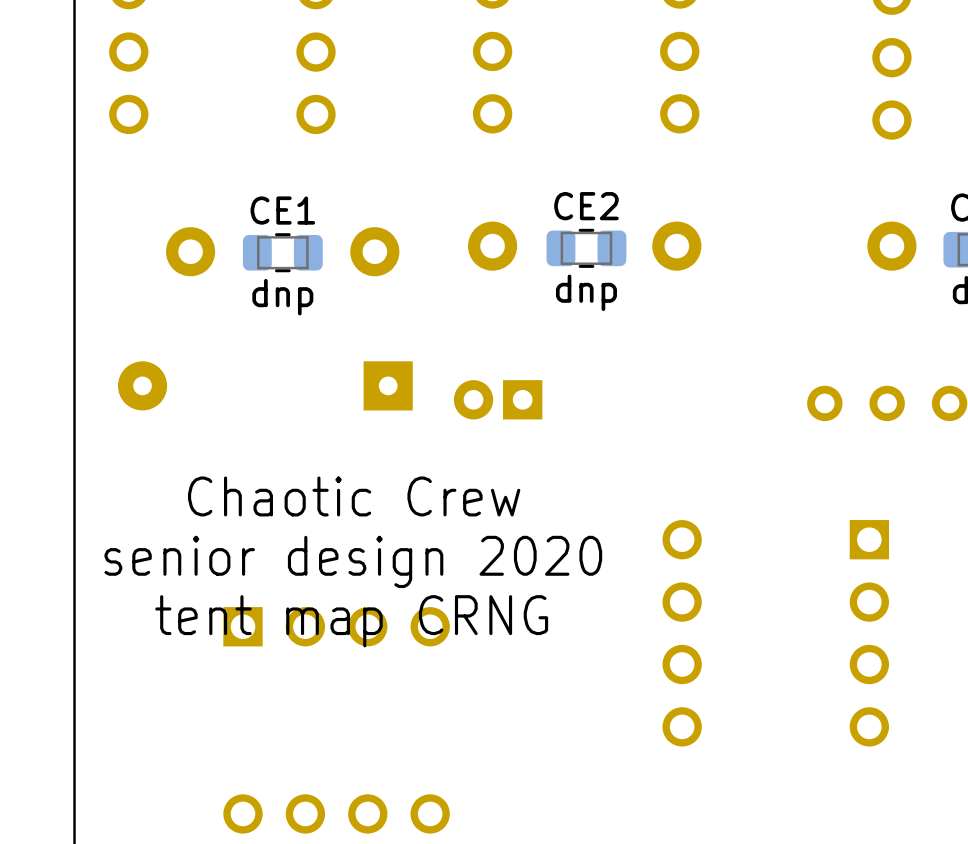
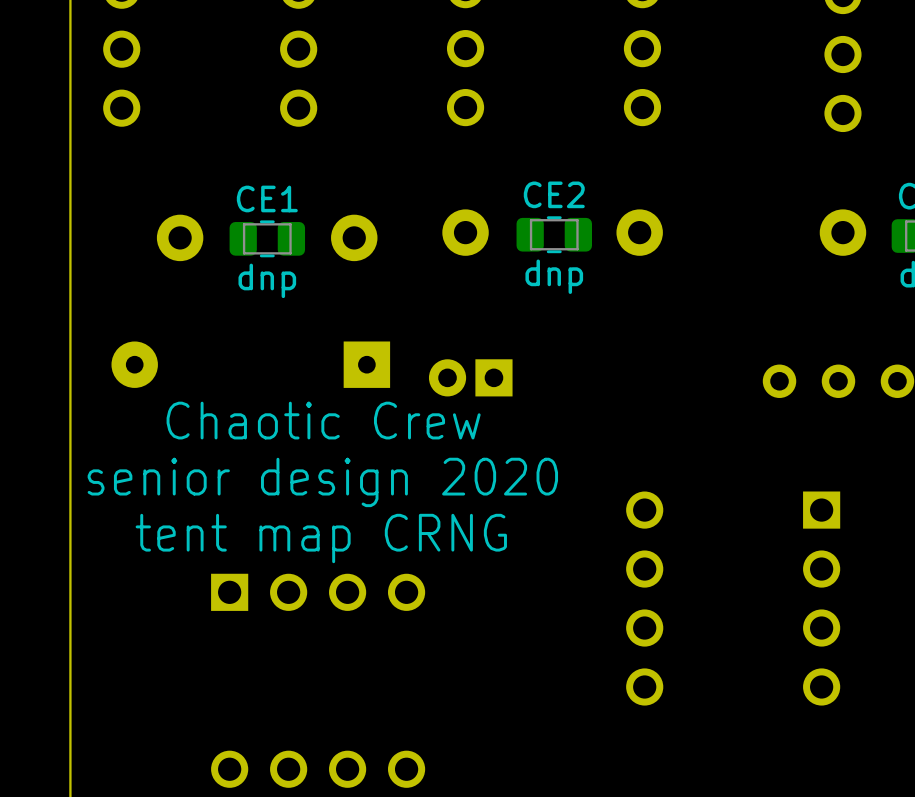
text: none -> Chaotic Crew (323, 420)
text: Chaotic Crew (354, 496) -> senior design 2020 (322, 482)
text: senior design 2020 (353, 561) -> tent map CRNG (321, 538)
text: tent map CRNG (351, 621) -> none

